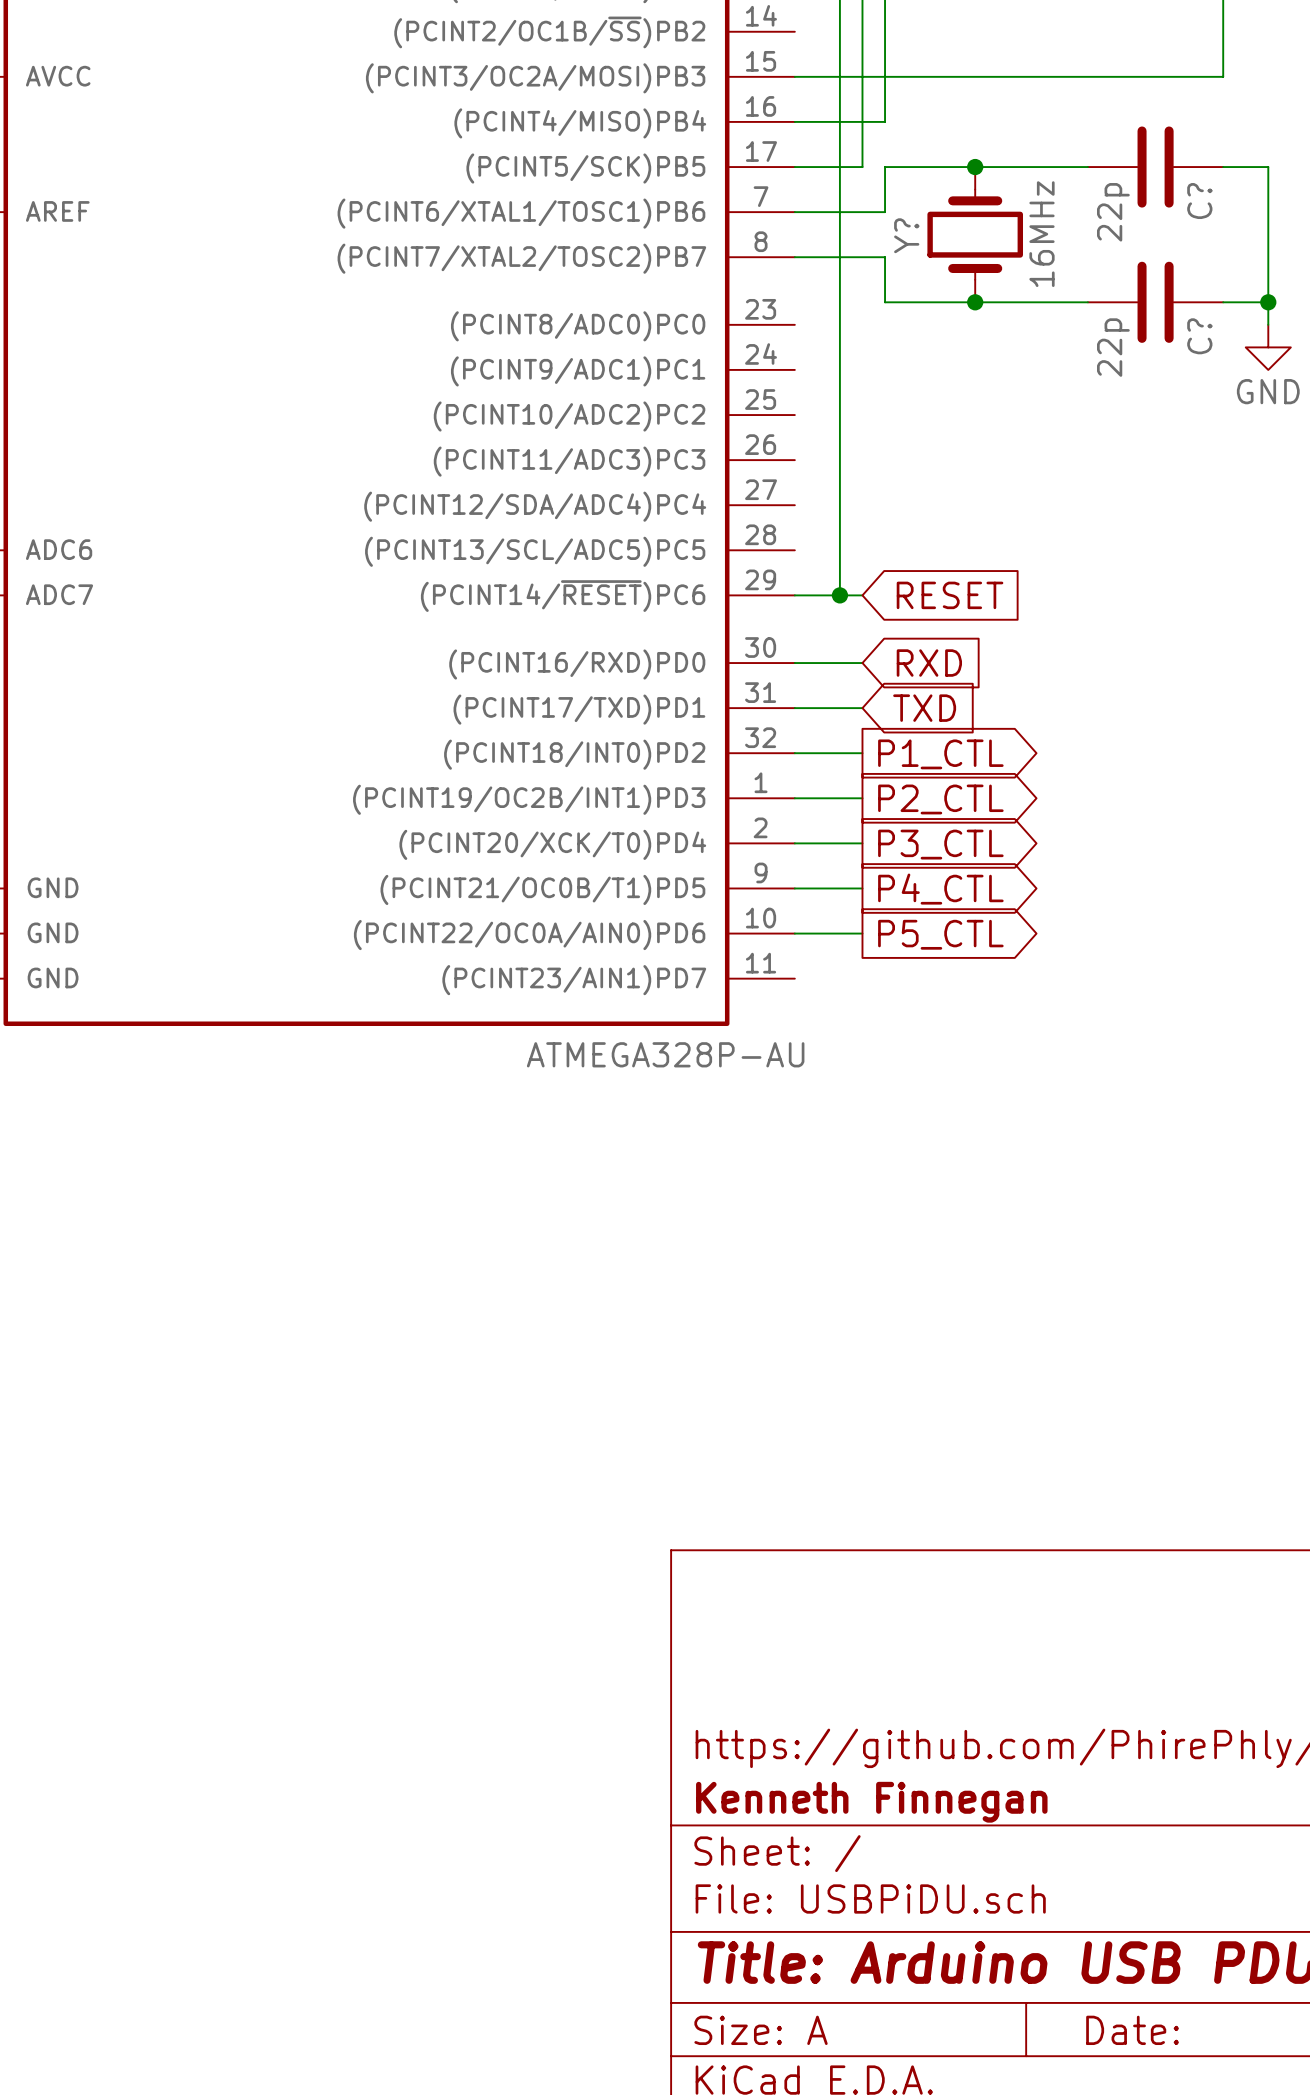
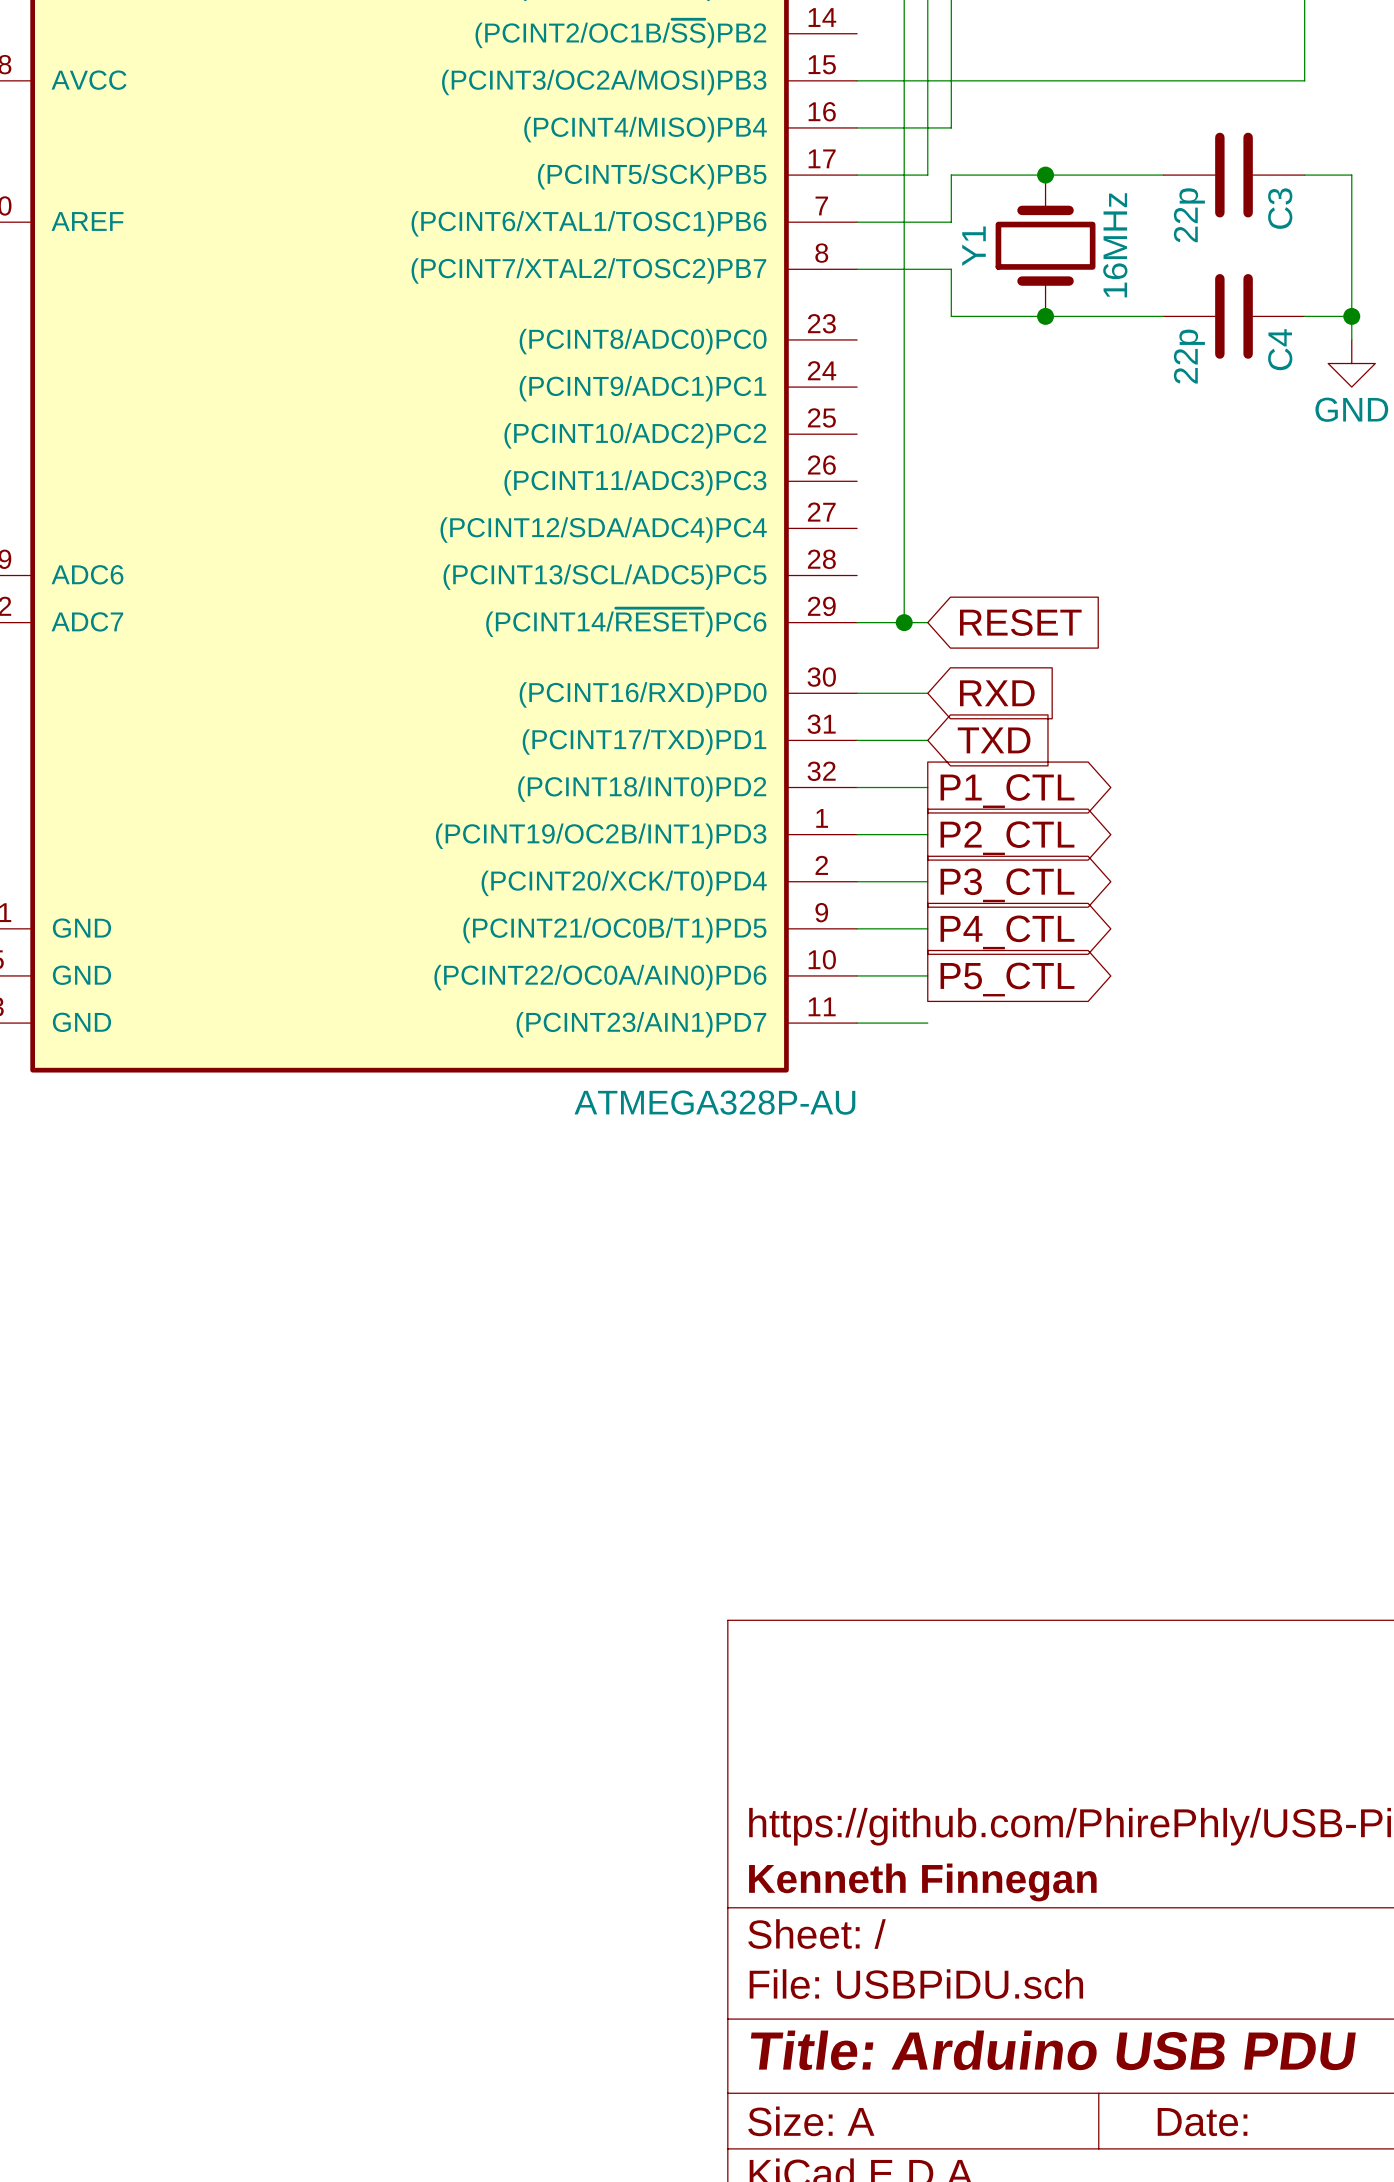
C? name: C? (1199, 201) -> C3 (1280, 208)
Y? name: Y? (906, 235) -> Y1 (974, 246)
C? name: C? (1199, 336) -> C4 (1280, 349)
wire: none -> (857, 1023) (927, 1023)

